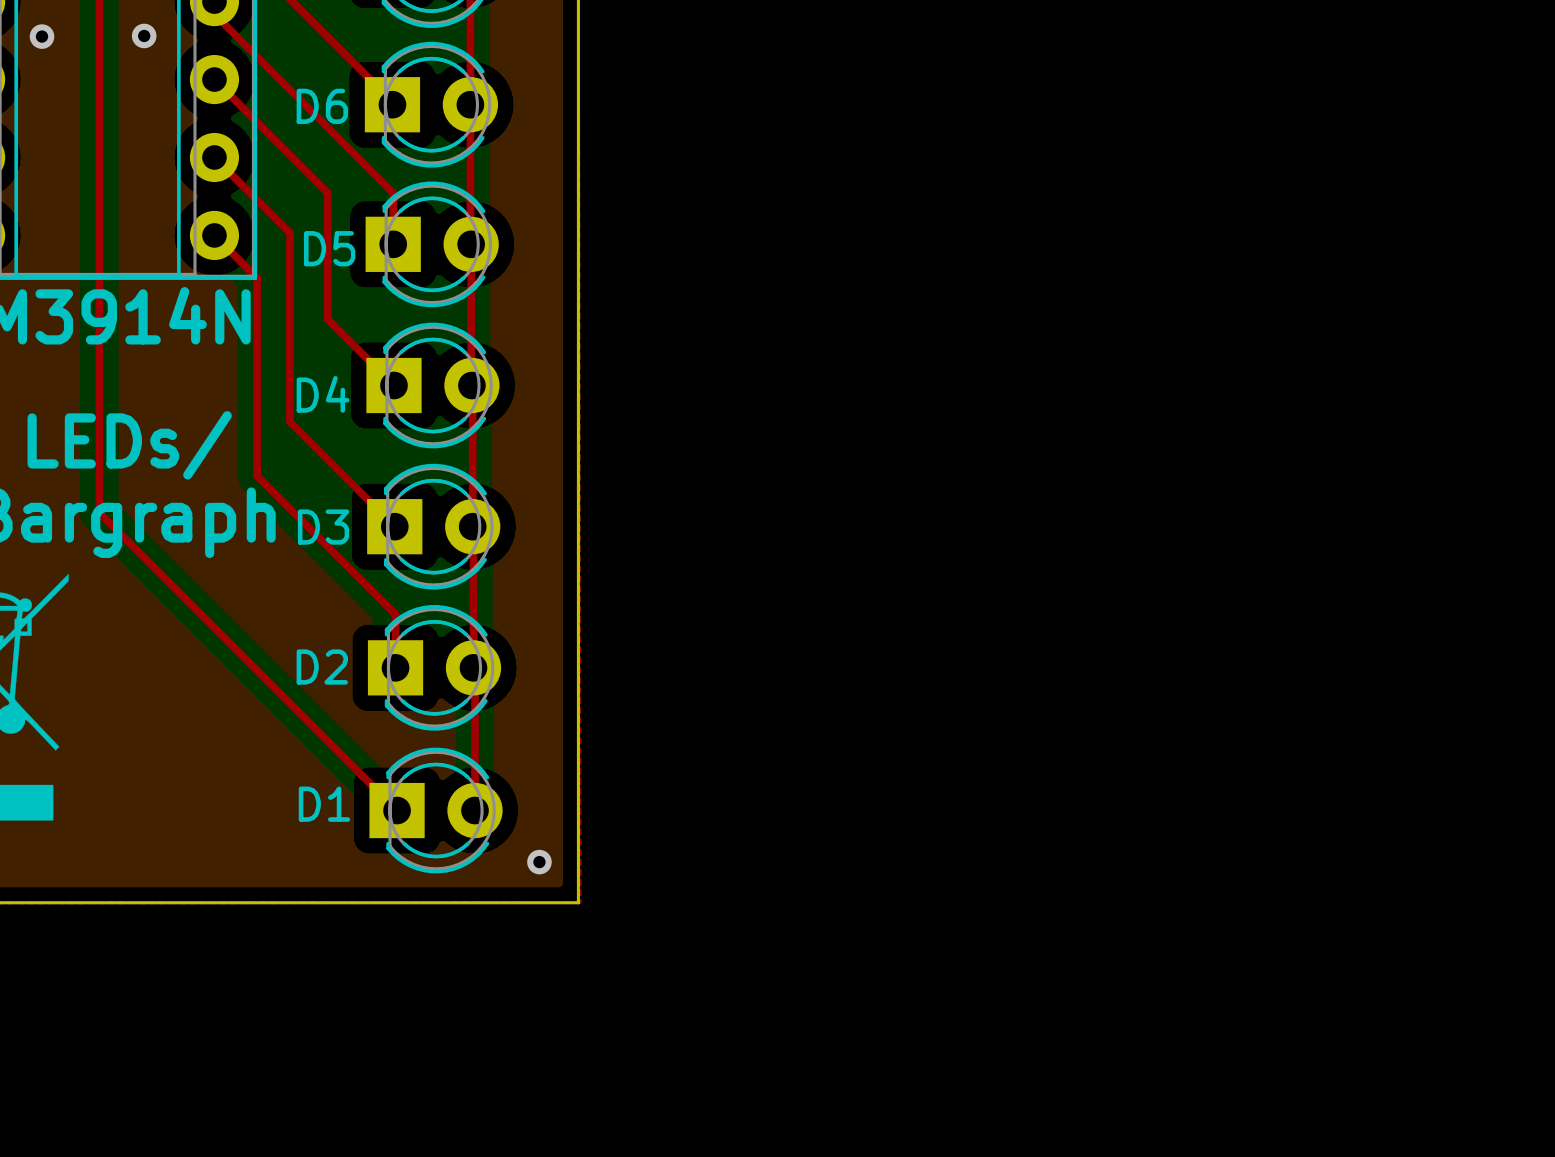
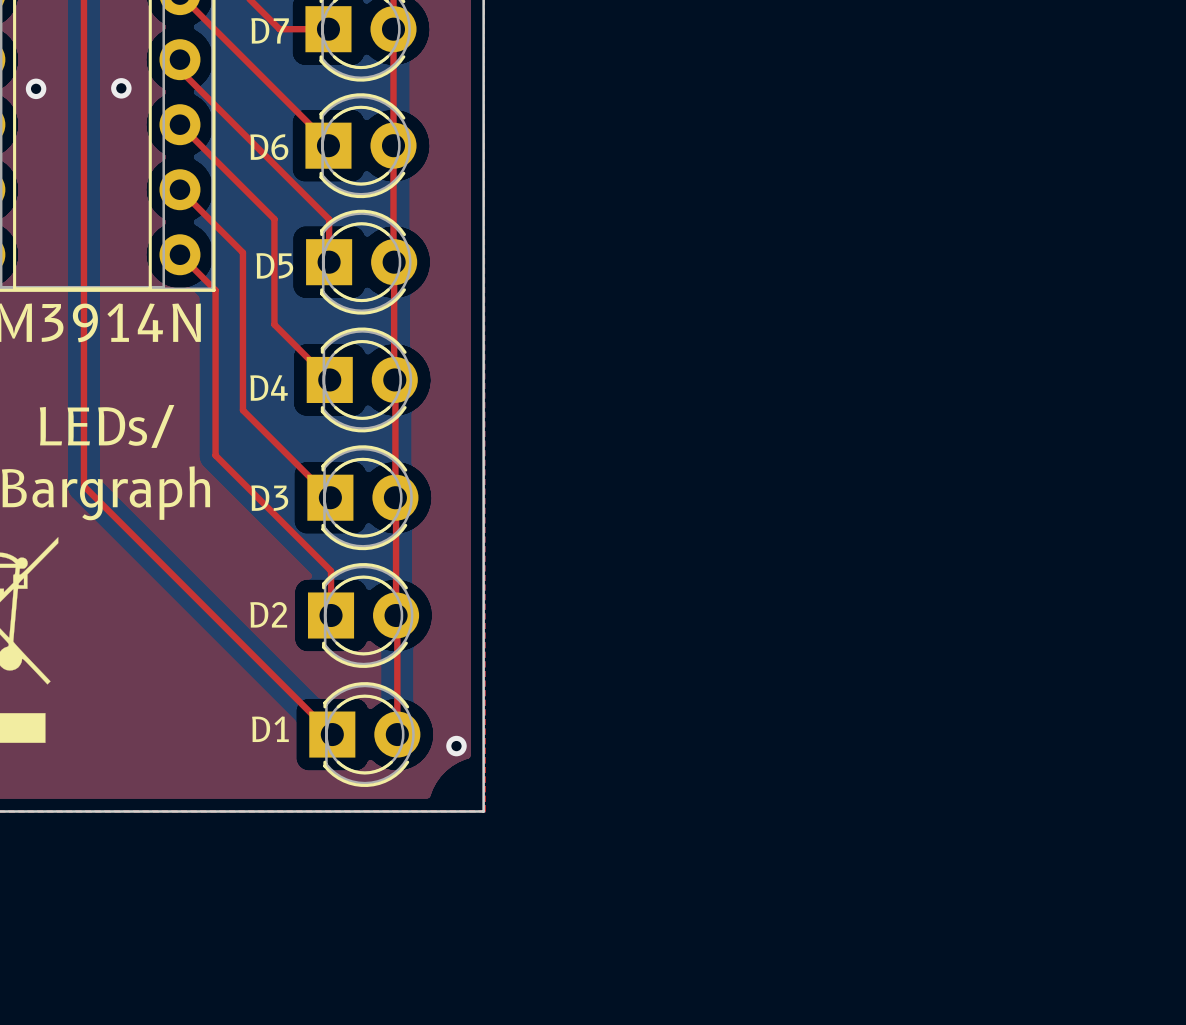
via position: (539, 862) -> (456, 746)

